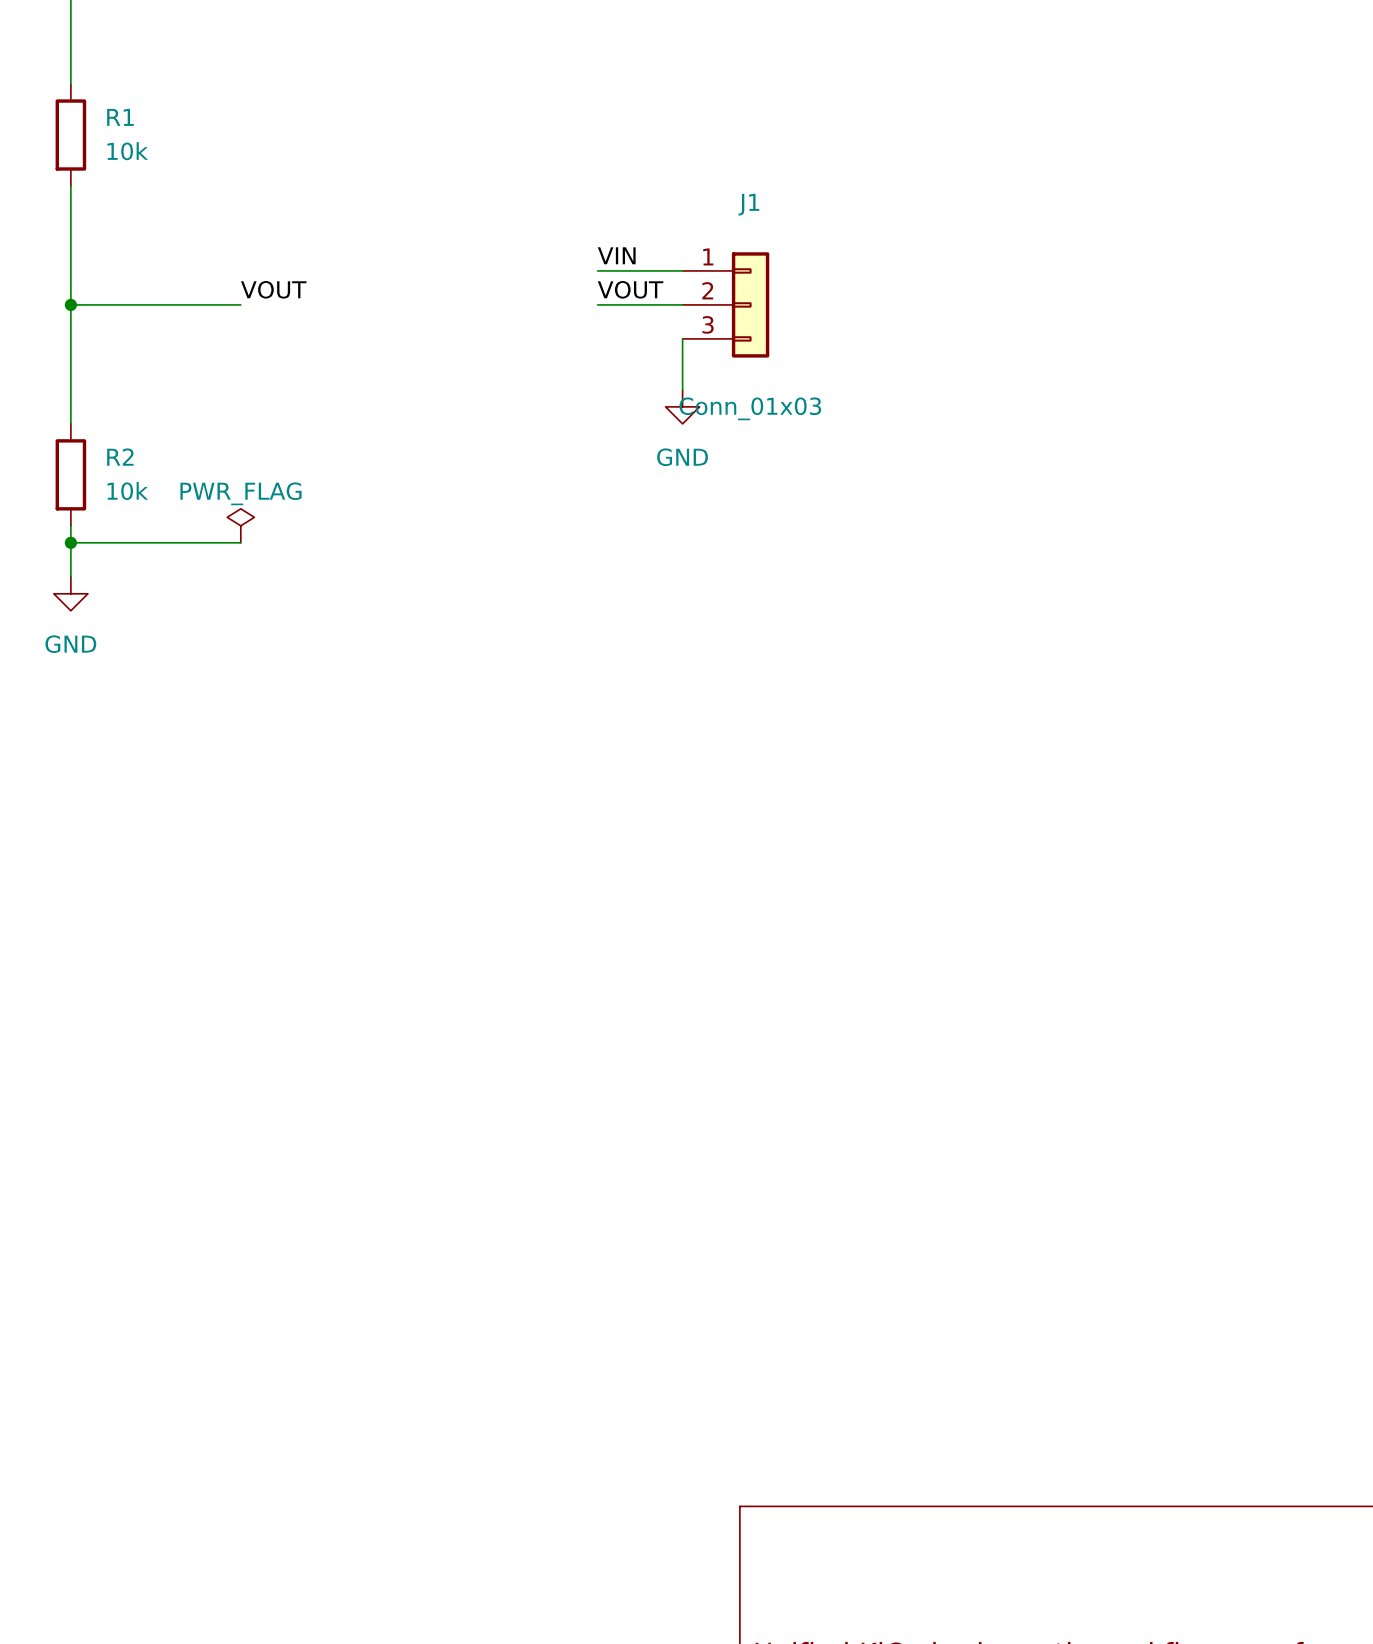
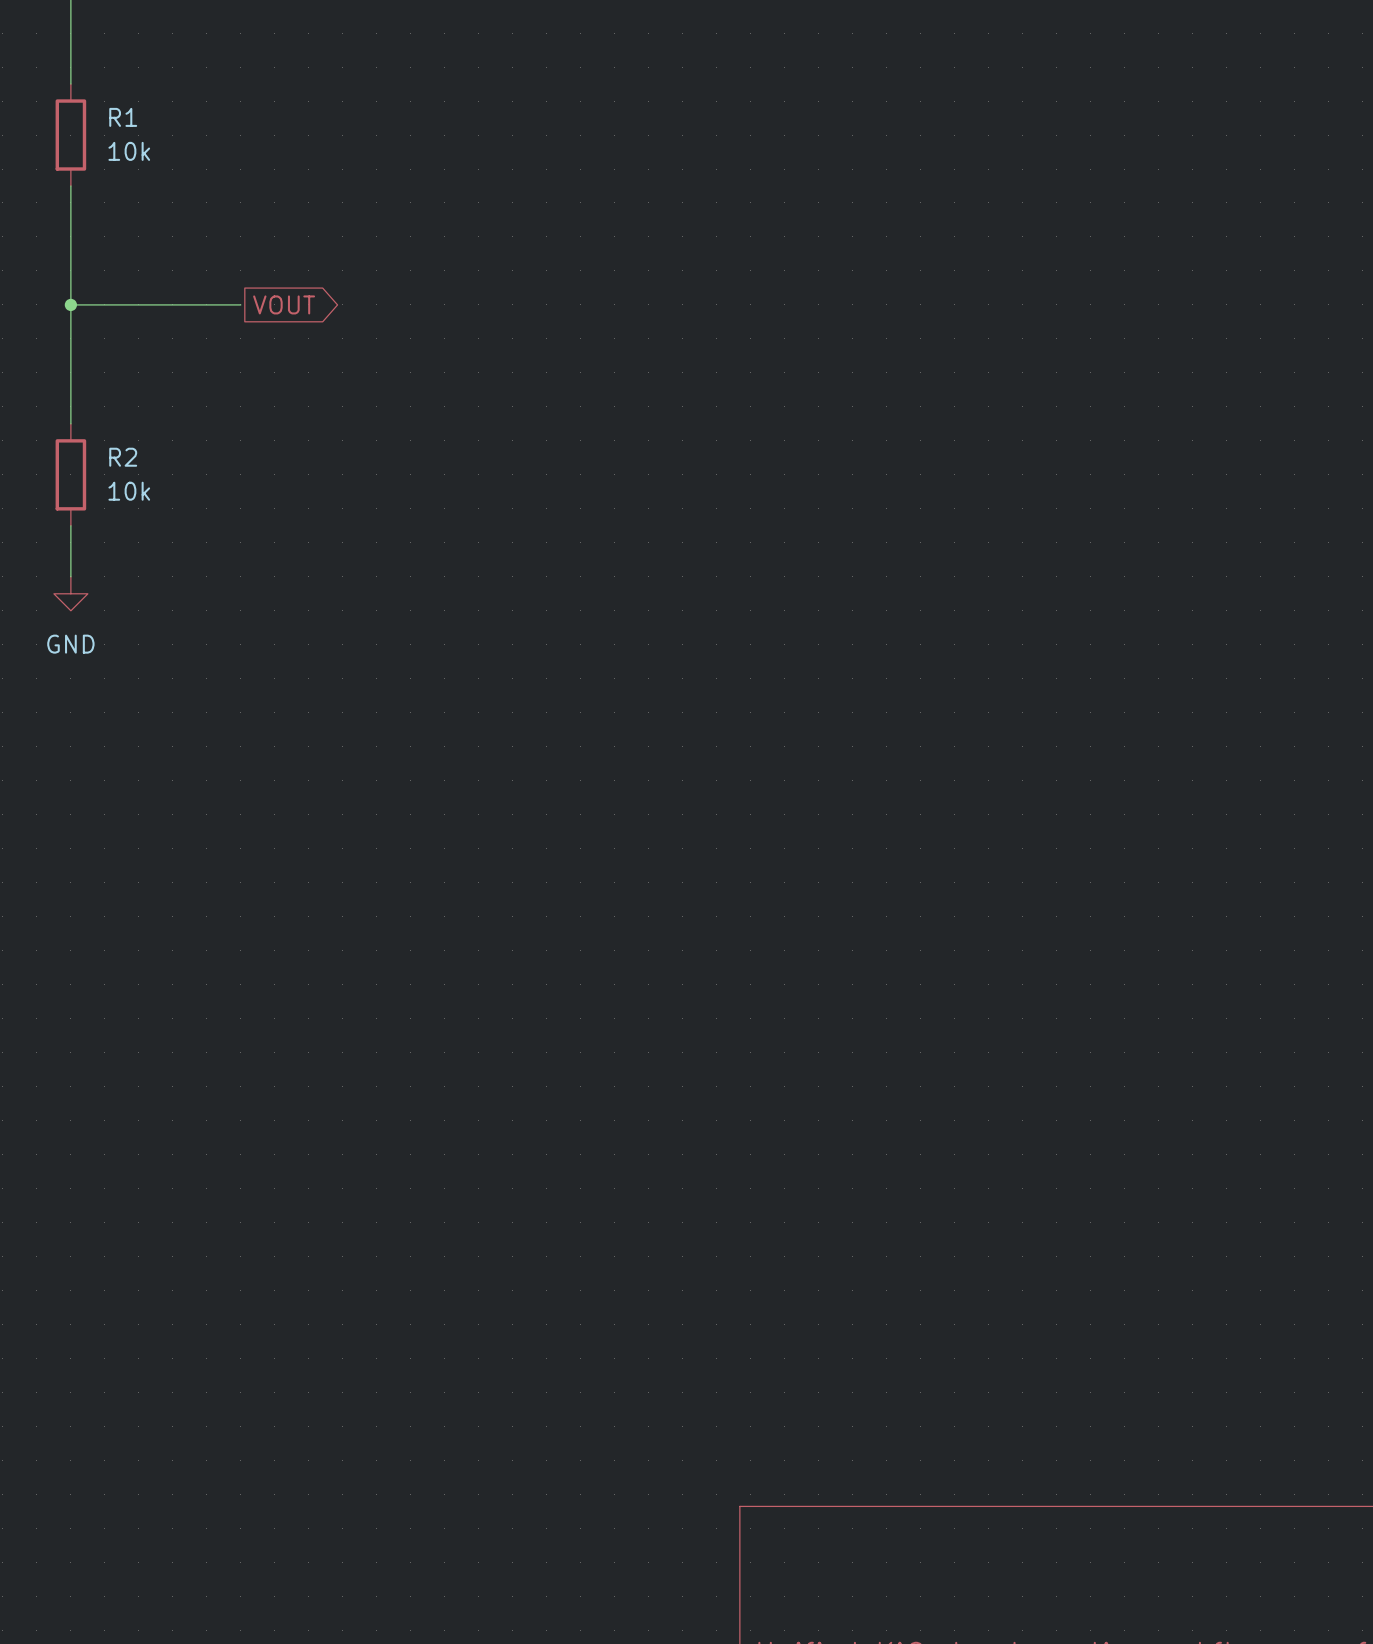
label: VIN (616, 255) -> none
wire: (597, 270) (682, 270) -> none
label: VOUT (273, 289) -> none
label: VOUT (630, 289) -> none
global label: none -> VOUT (284, 304)
wire: (597, 304) (682, 304) -> none
J1: Conn_01x03 (725, 304) -> none
wire: (682, 338) (682, 389) -> none
power symbol: GND (682, 406) -> none
power symbol: PWR_FLAG (240, 525) -> none
wire: (70, 542) (240, 542) -> none
junction: (70, 542) -> none

